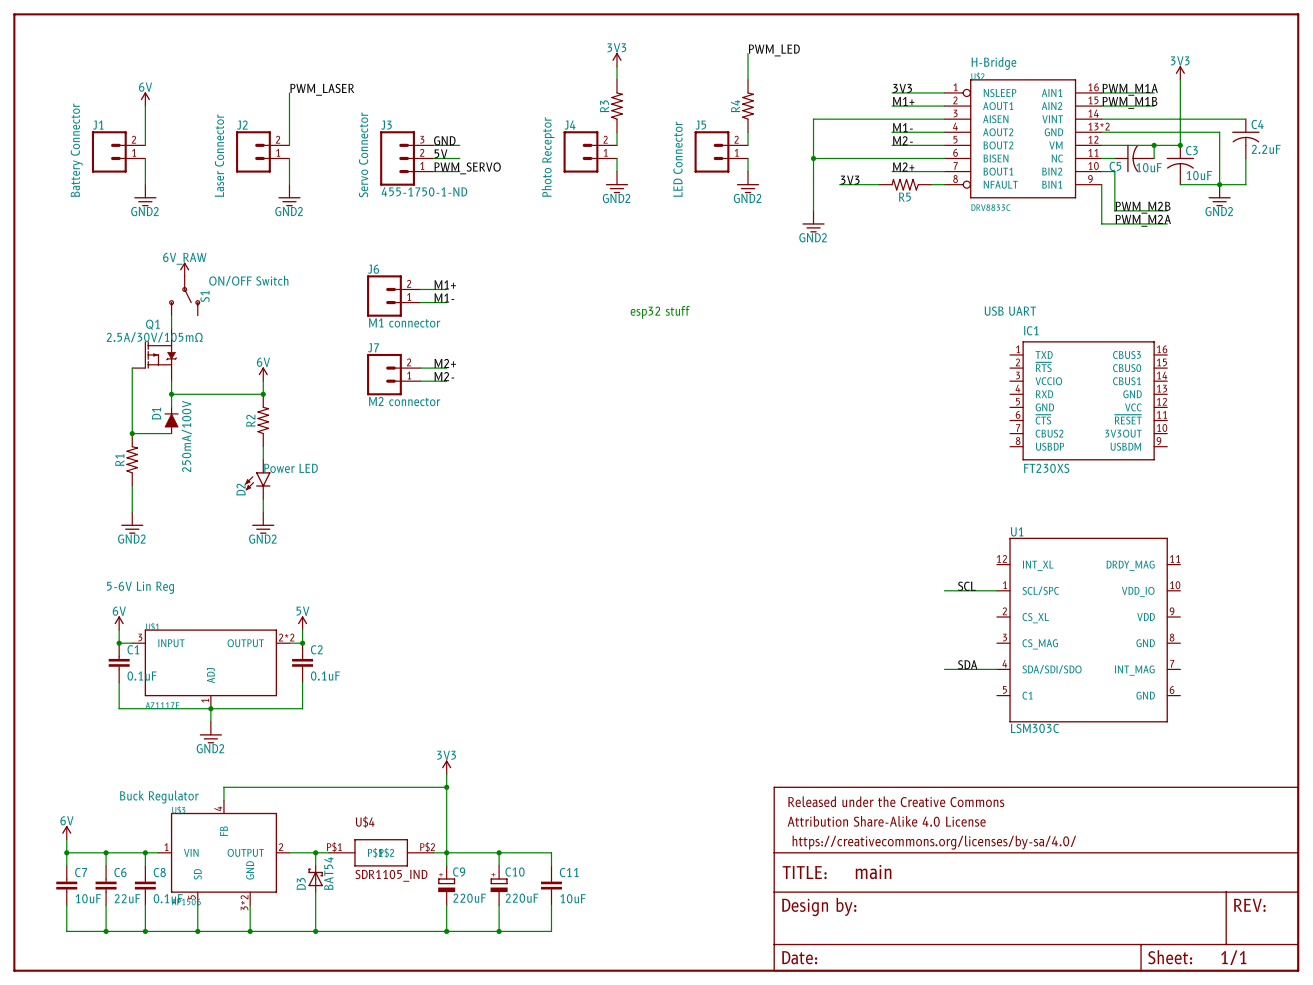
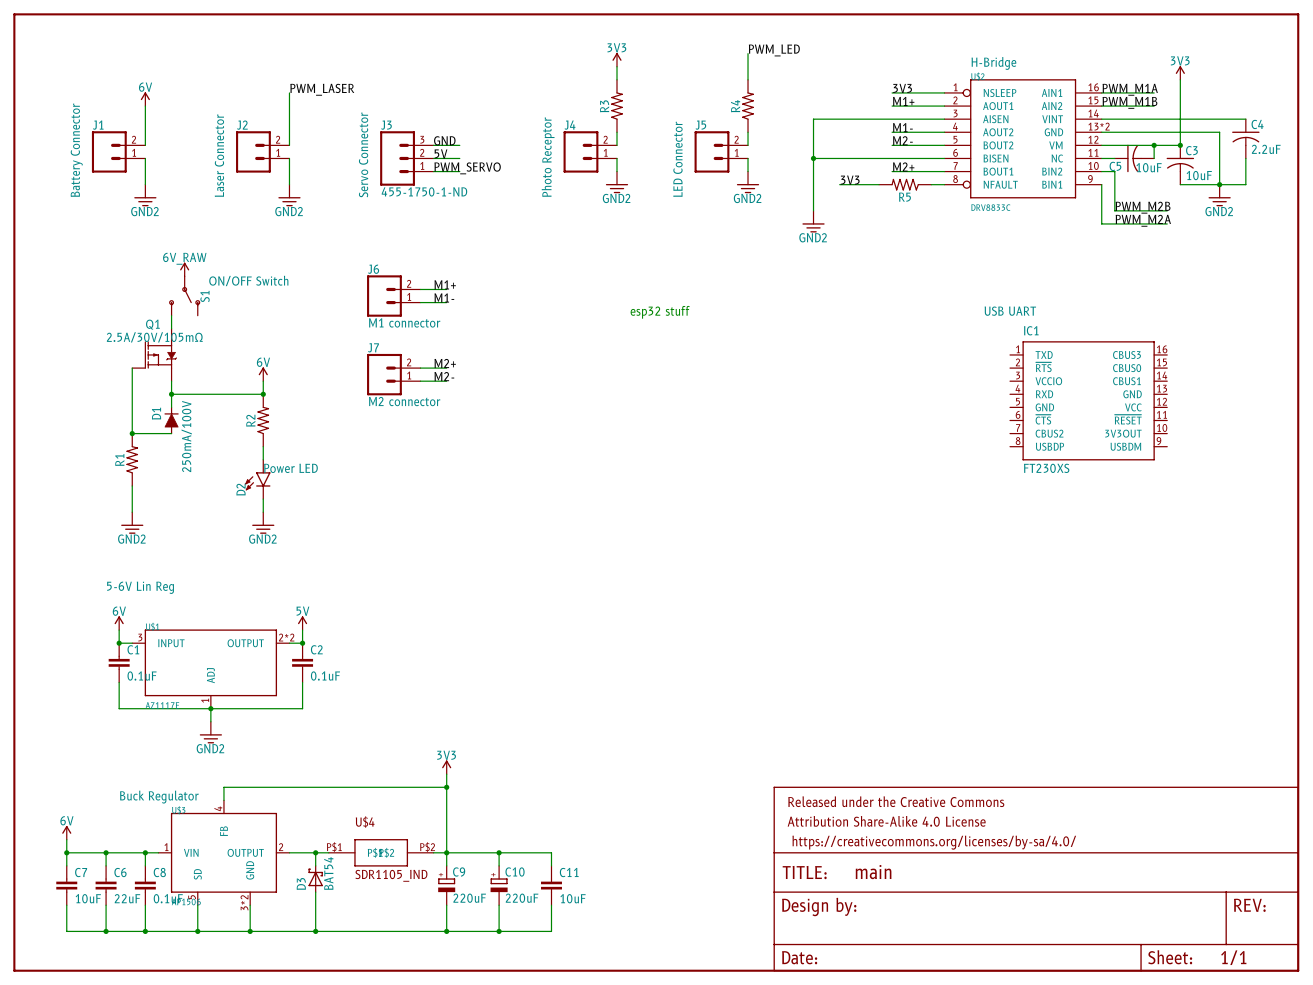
label: SCL (966, 586) -> none
wire: (944, 590) (996, 590) -> none
U1: LSM303C (1088, 630) -> none
label: SDA (967, 664) -> none
wire: (944, 669) (996, 669) -> none

